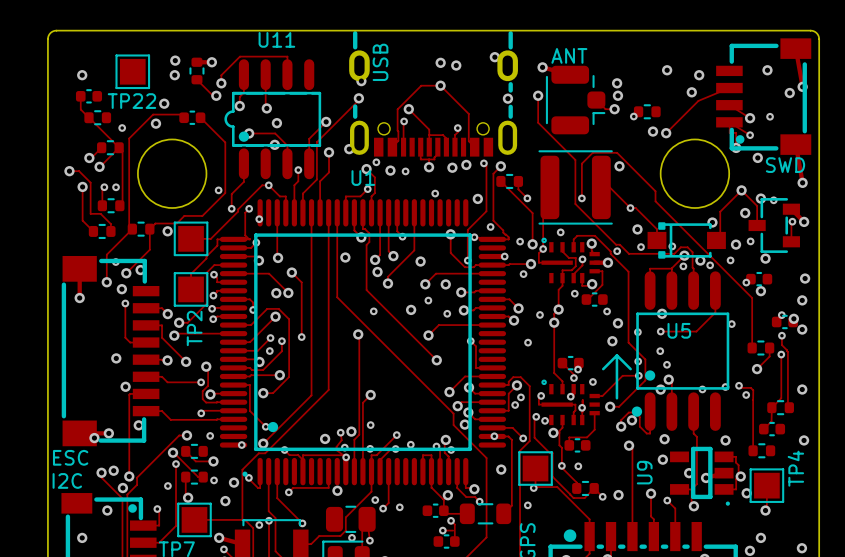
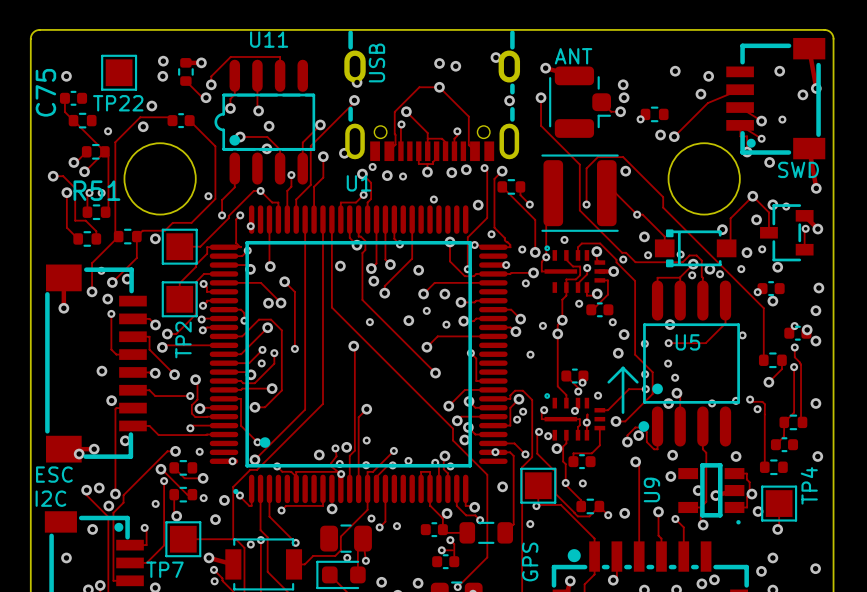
C75 name: none -> C75 (45, 92)
R51 name: none -> R51 (96, 190)

